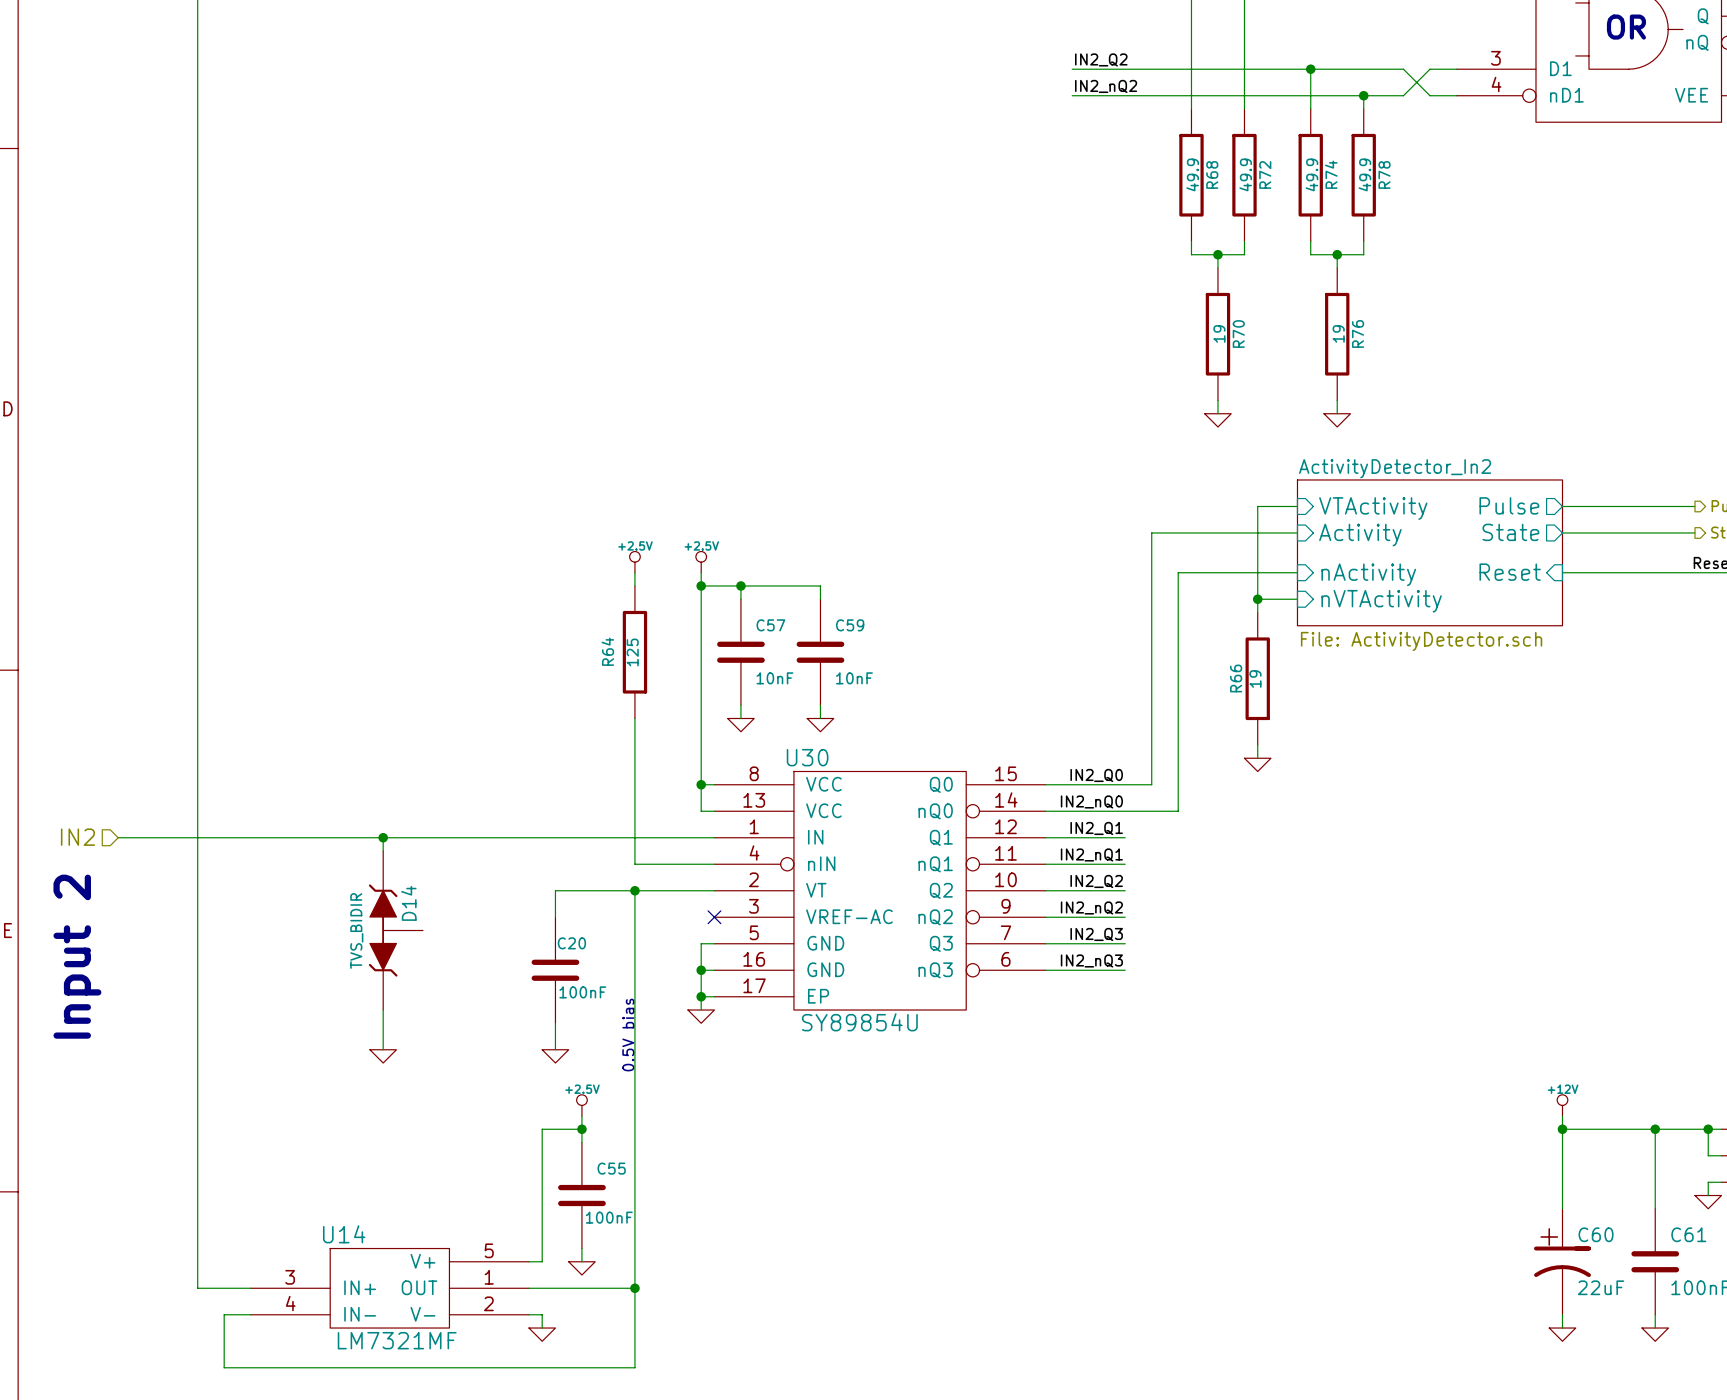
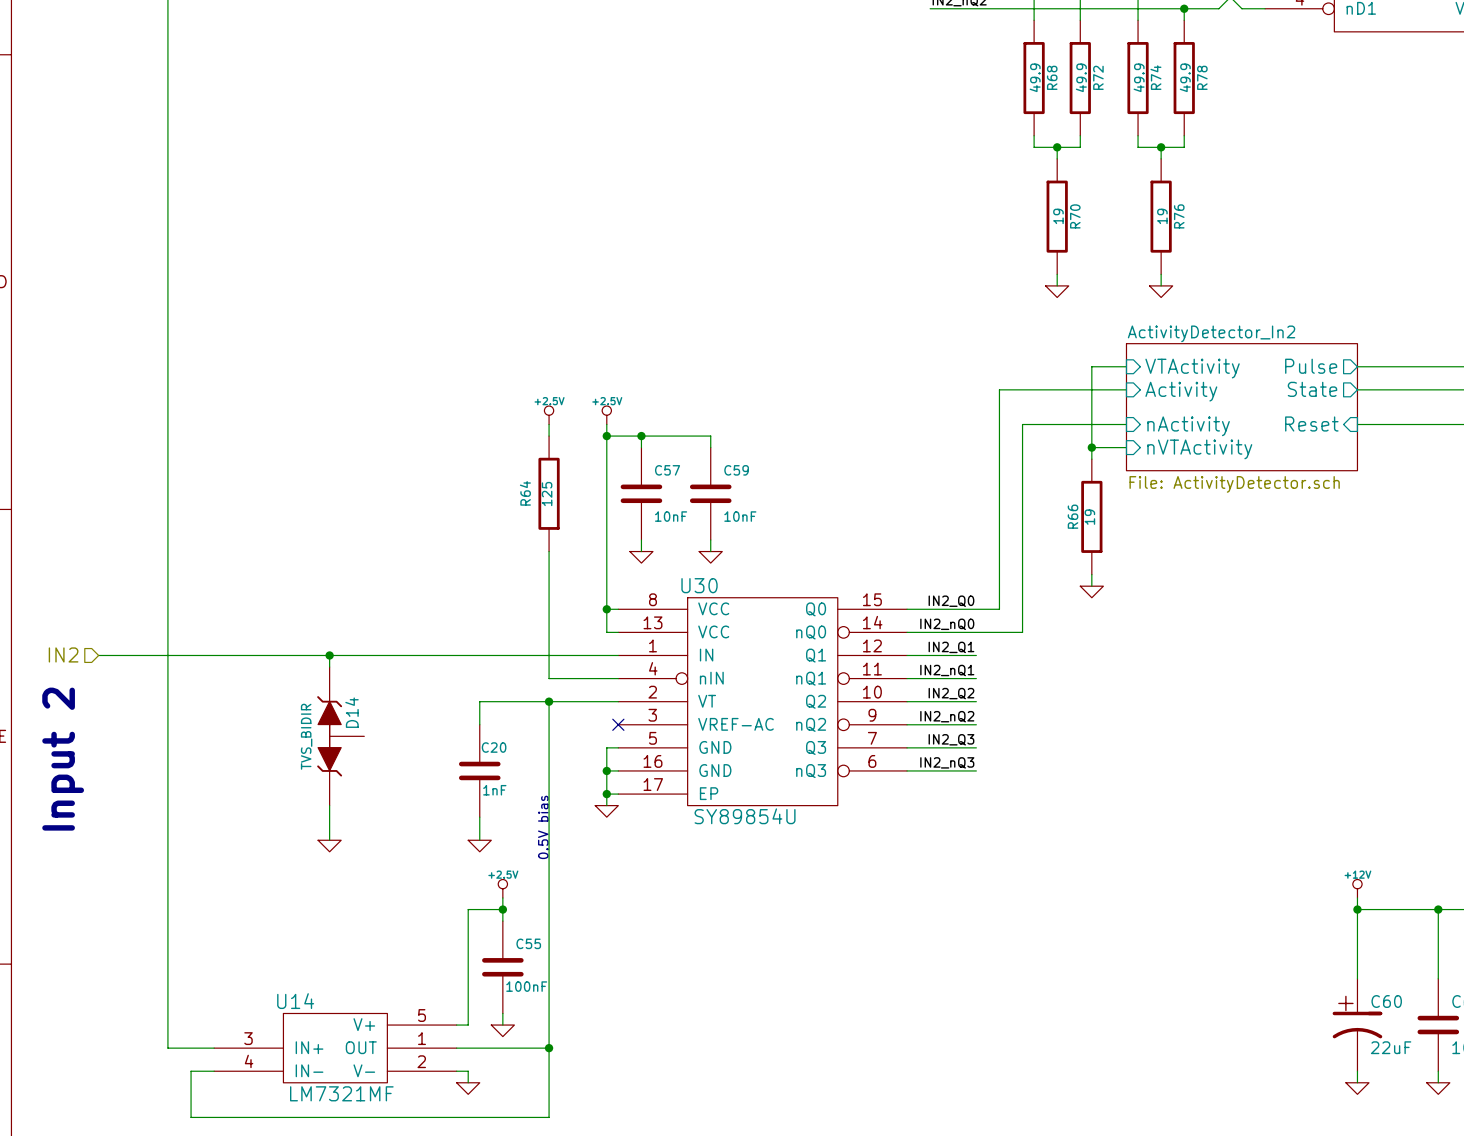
C20 value: 100nF (582, 992) -> 1nF (494, 790)

